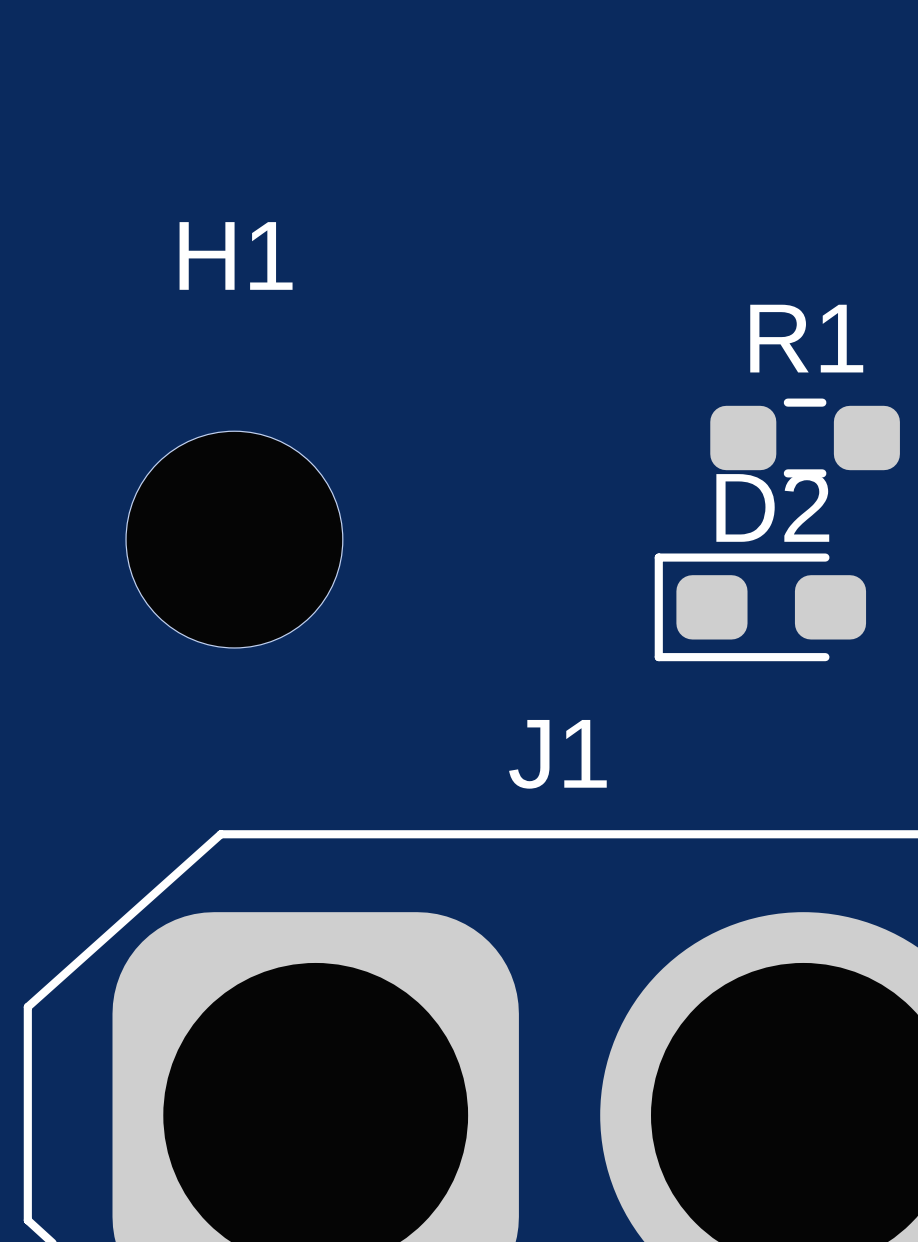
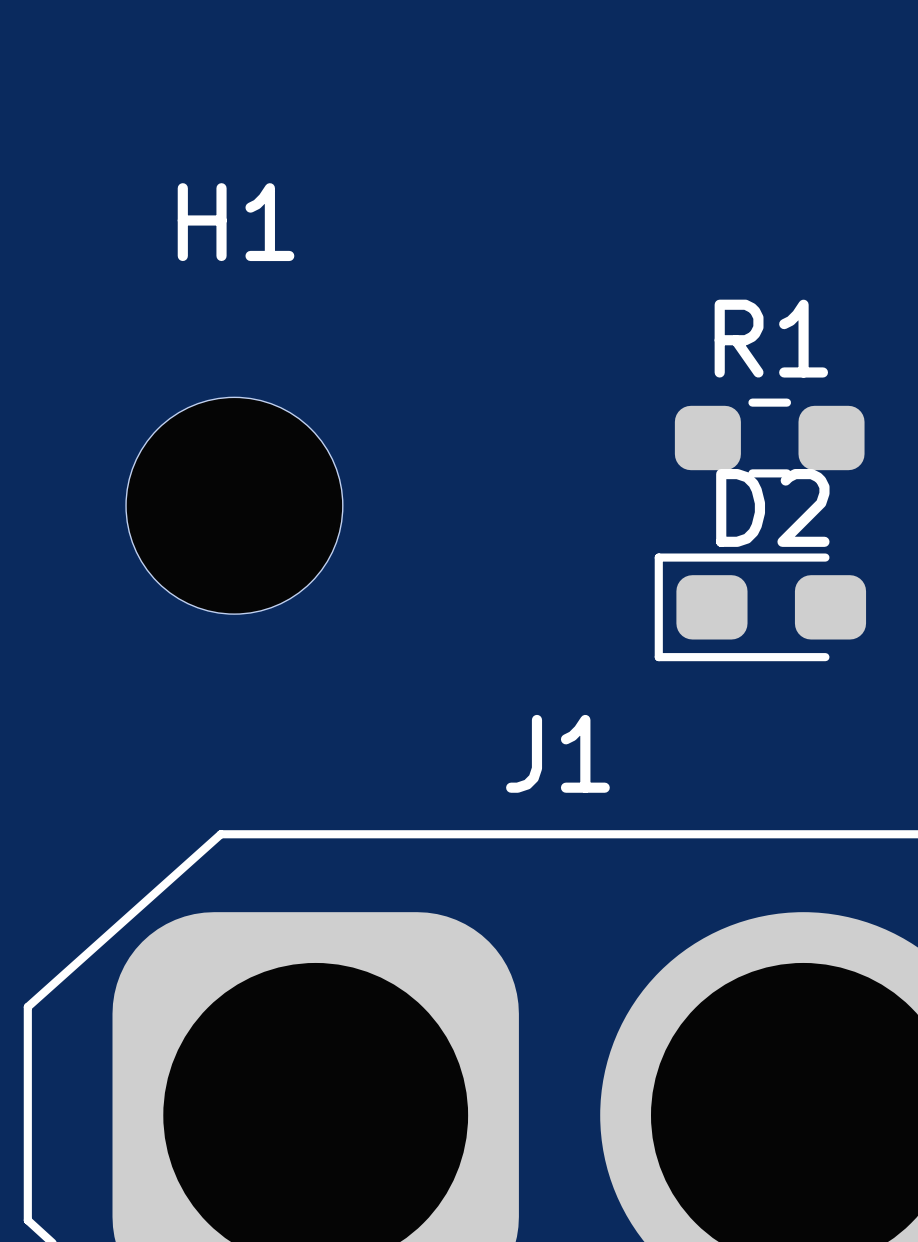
R1 position: (805, 438) -> (769, 438)
H1 position: (234, 539) -> (234, 505)

